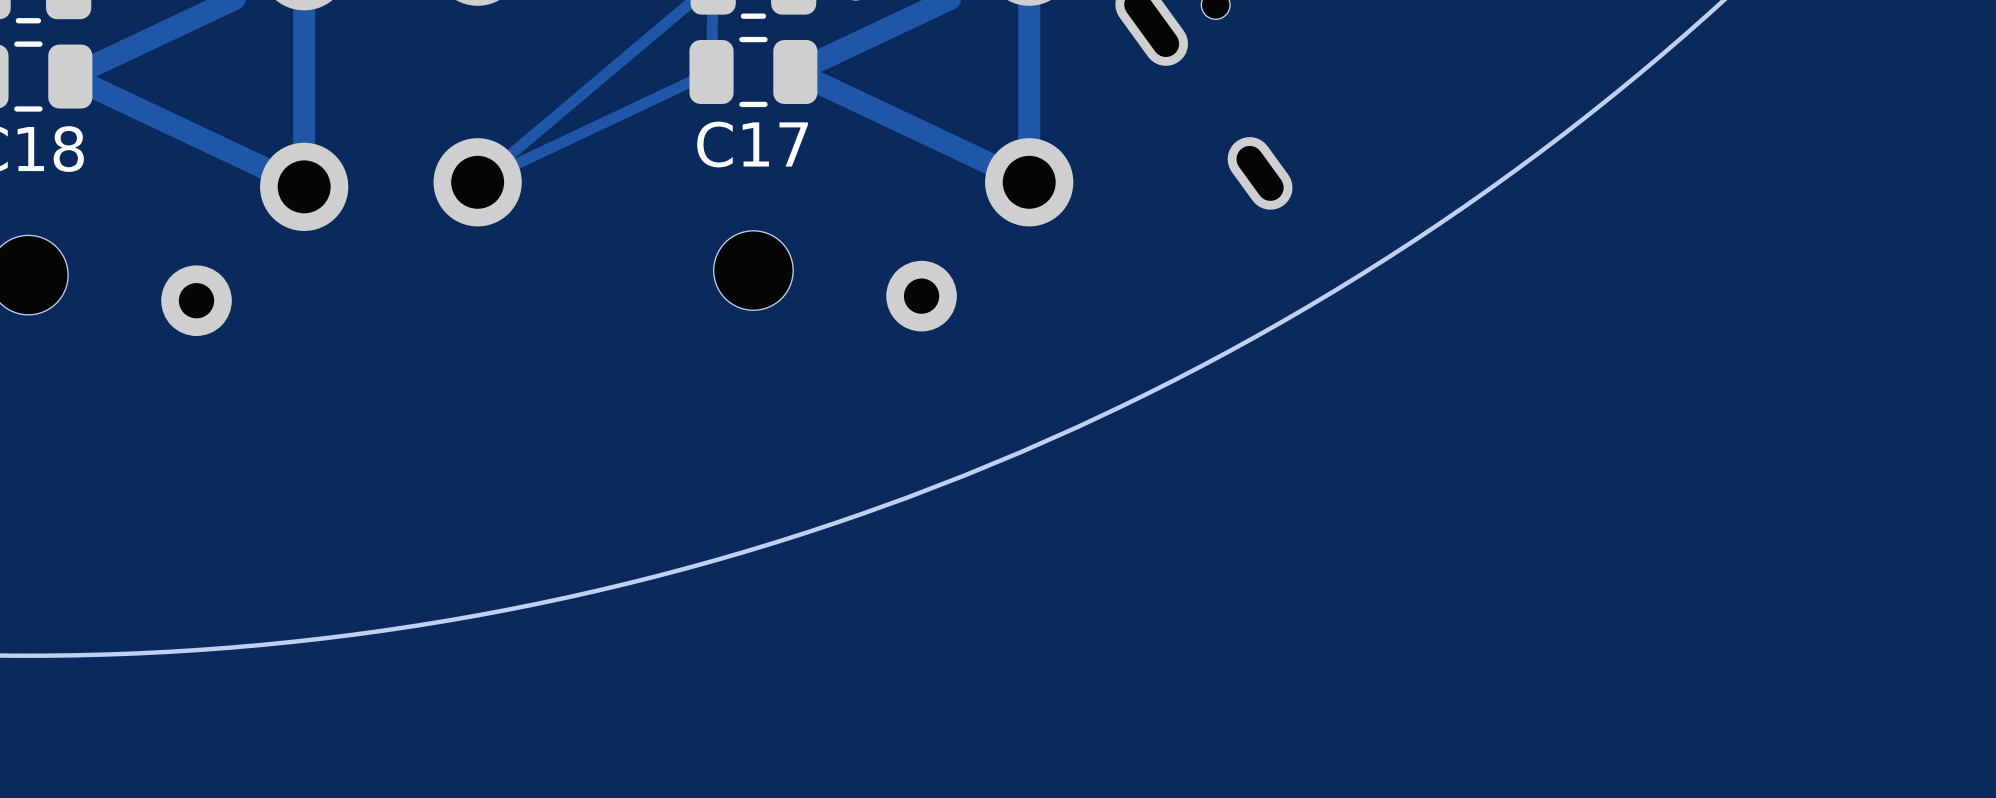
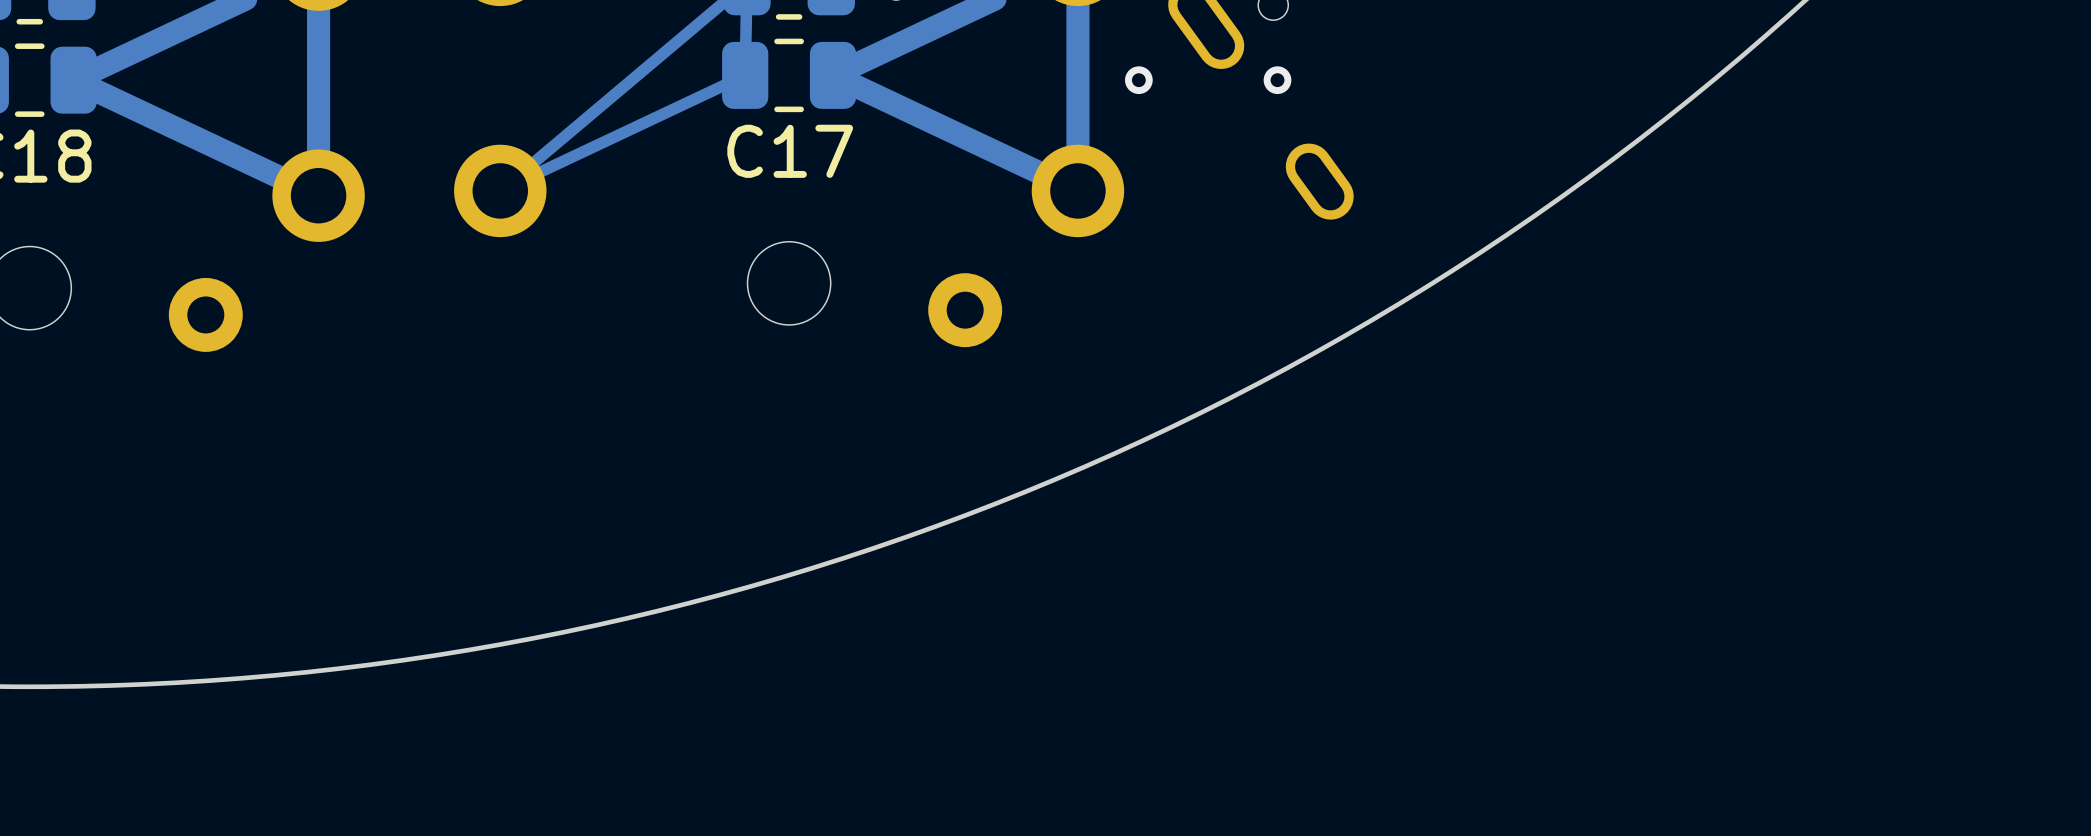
via: none -> (1138, 80)
via: none -> (1277, 80)

